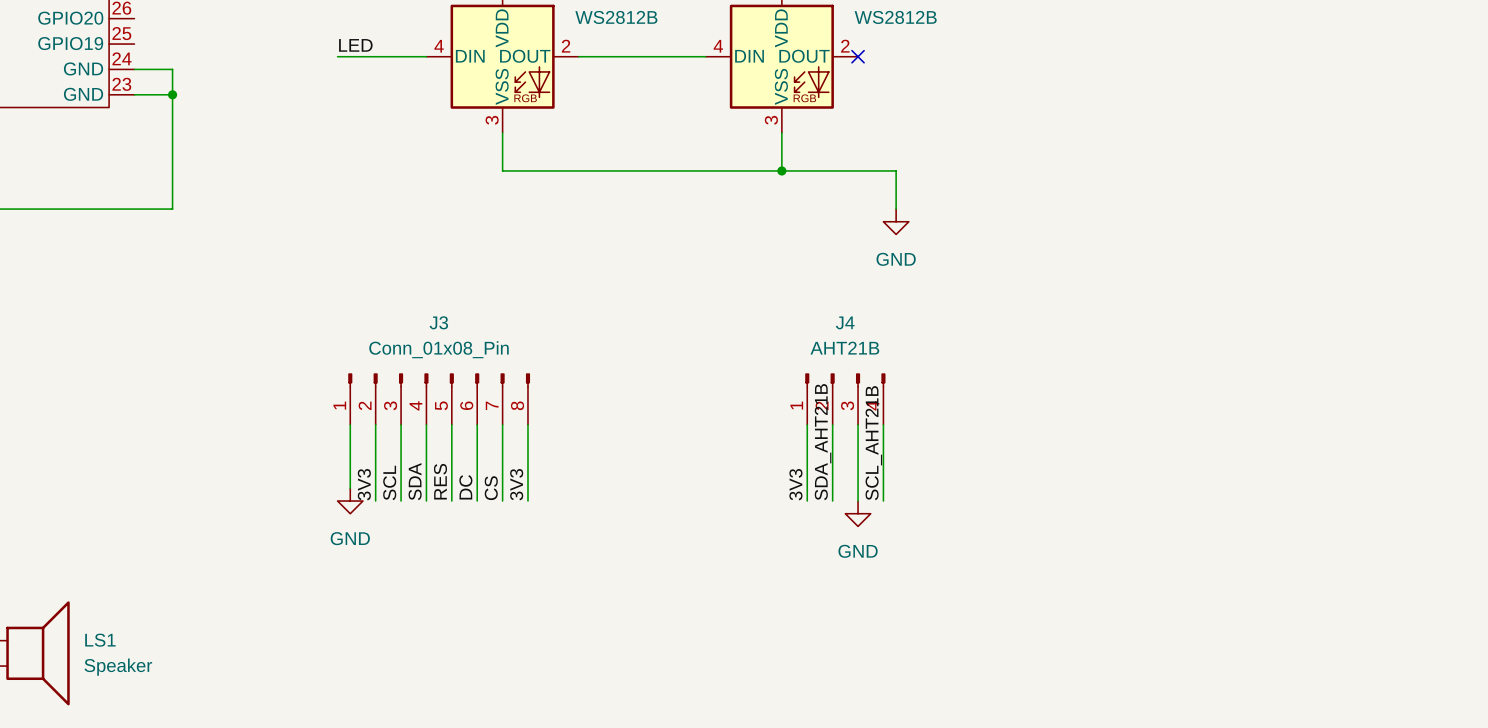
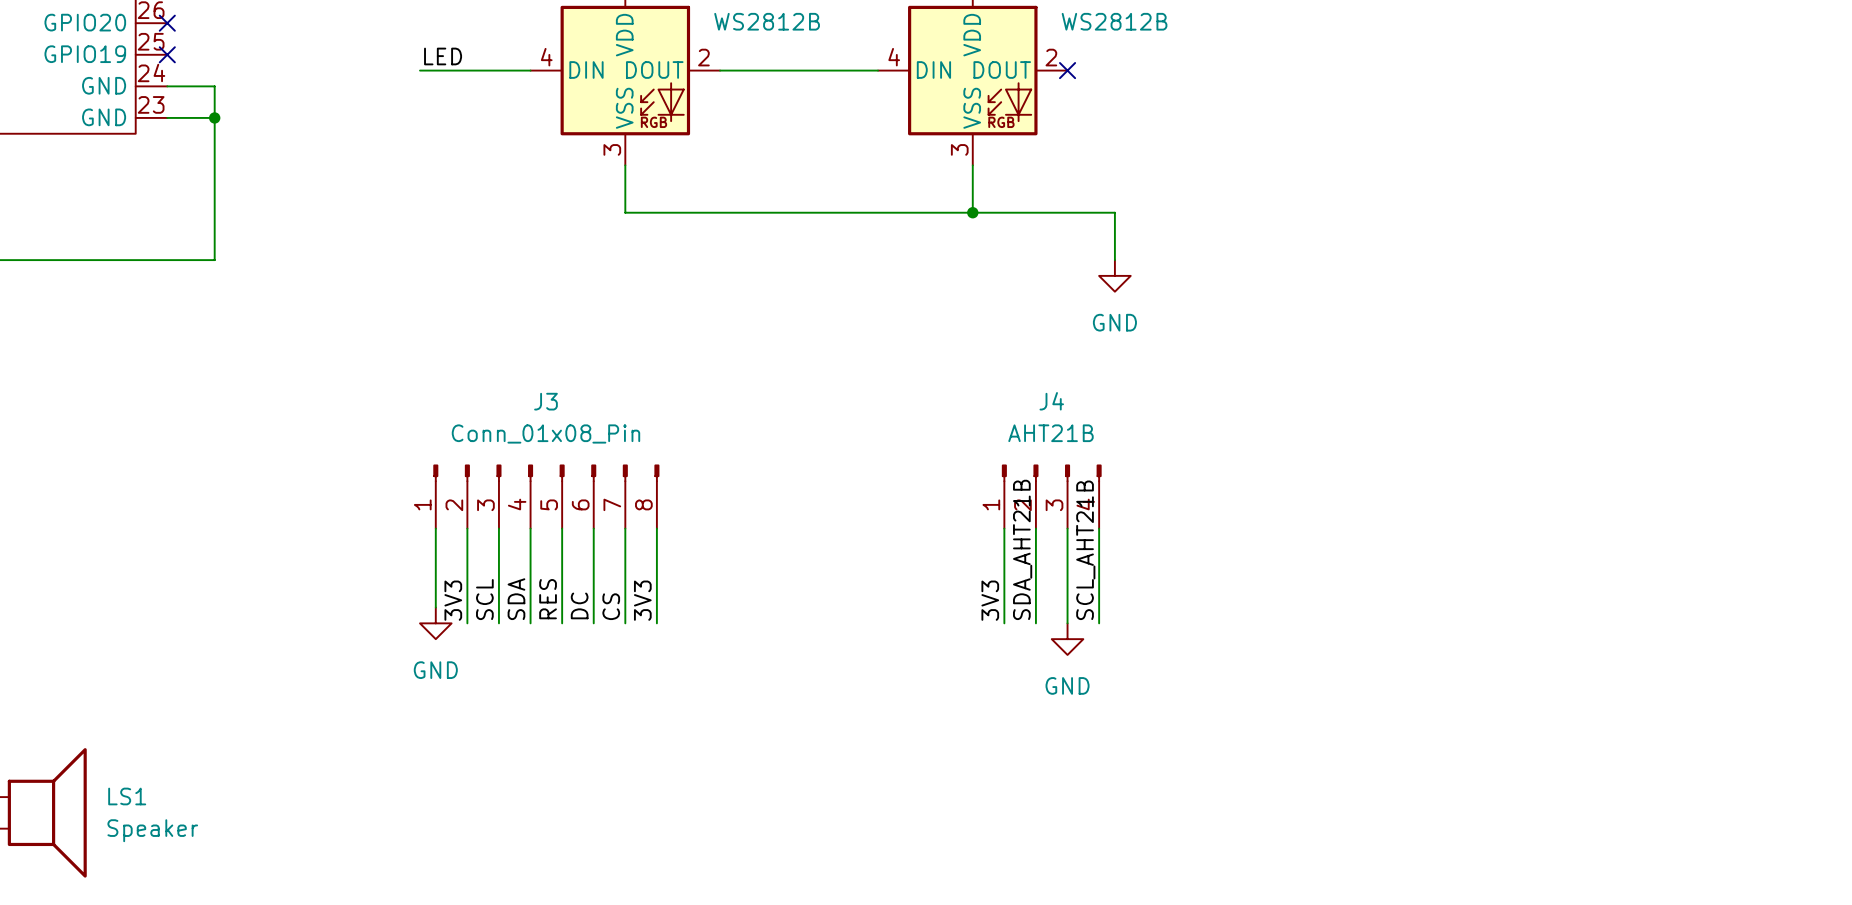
no-connect mark: none -> (167, 23)
no-connect mark: none -> (167, 54)

